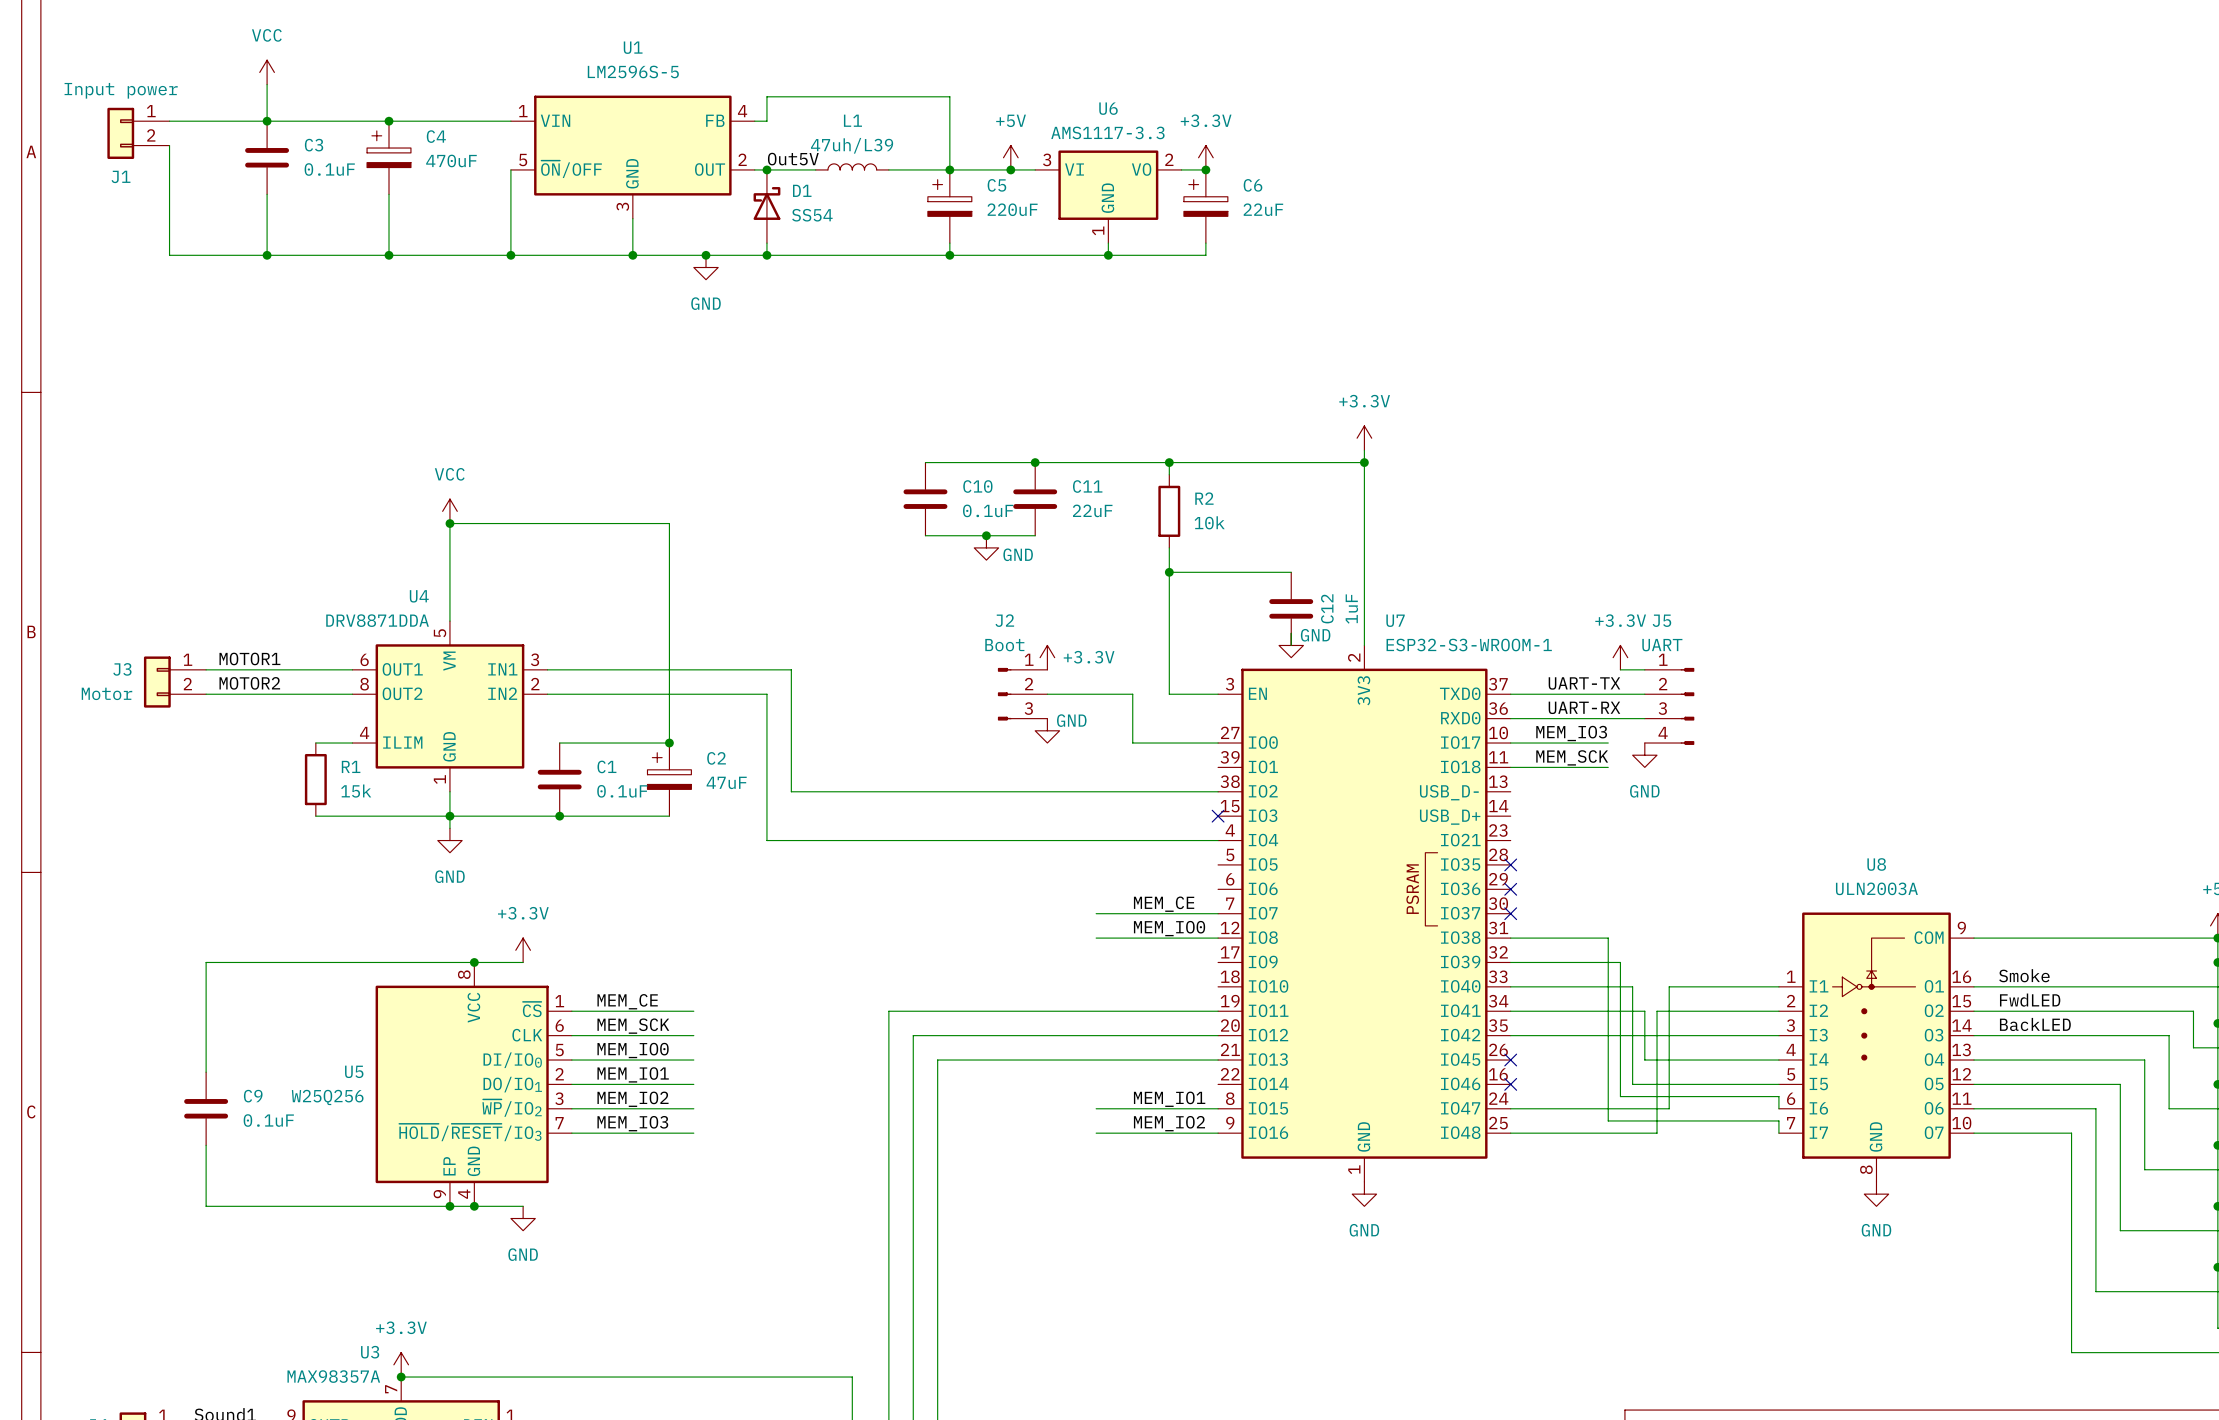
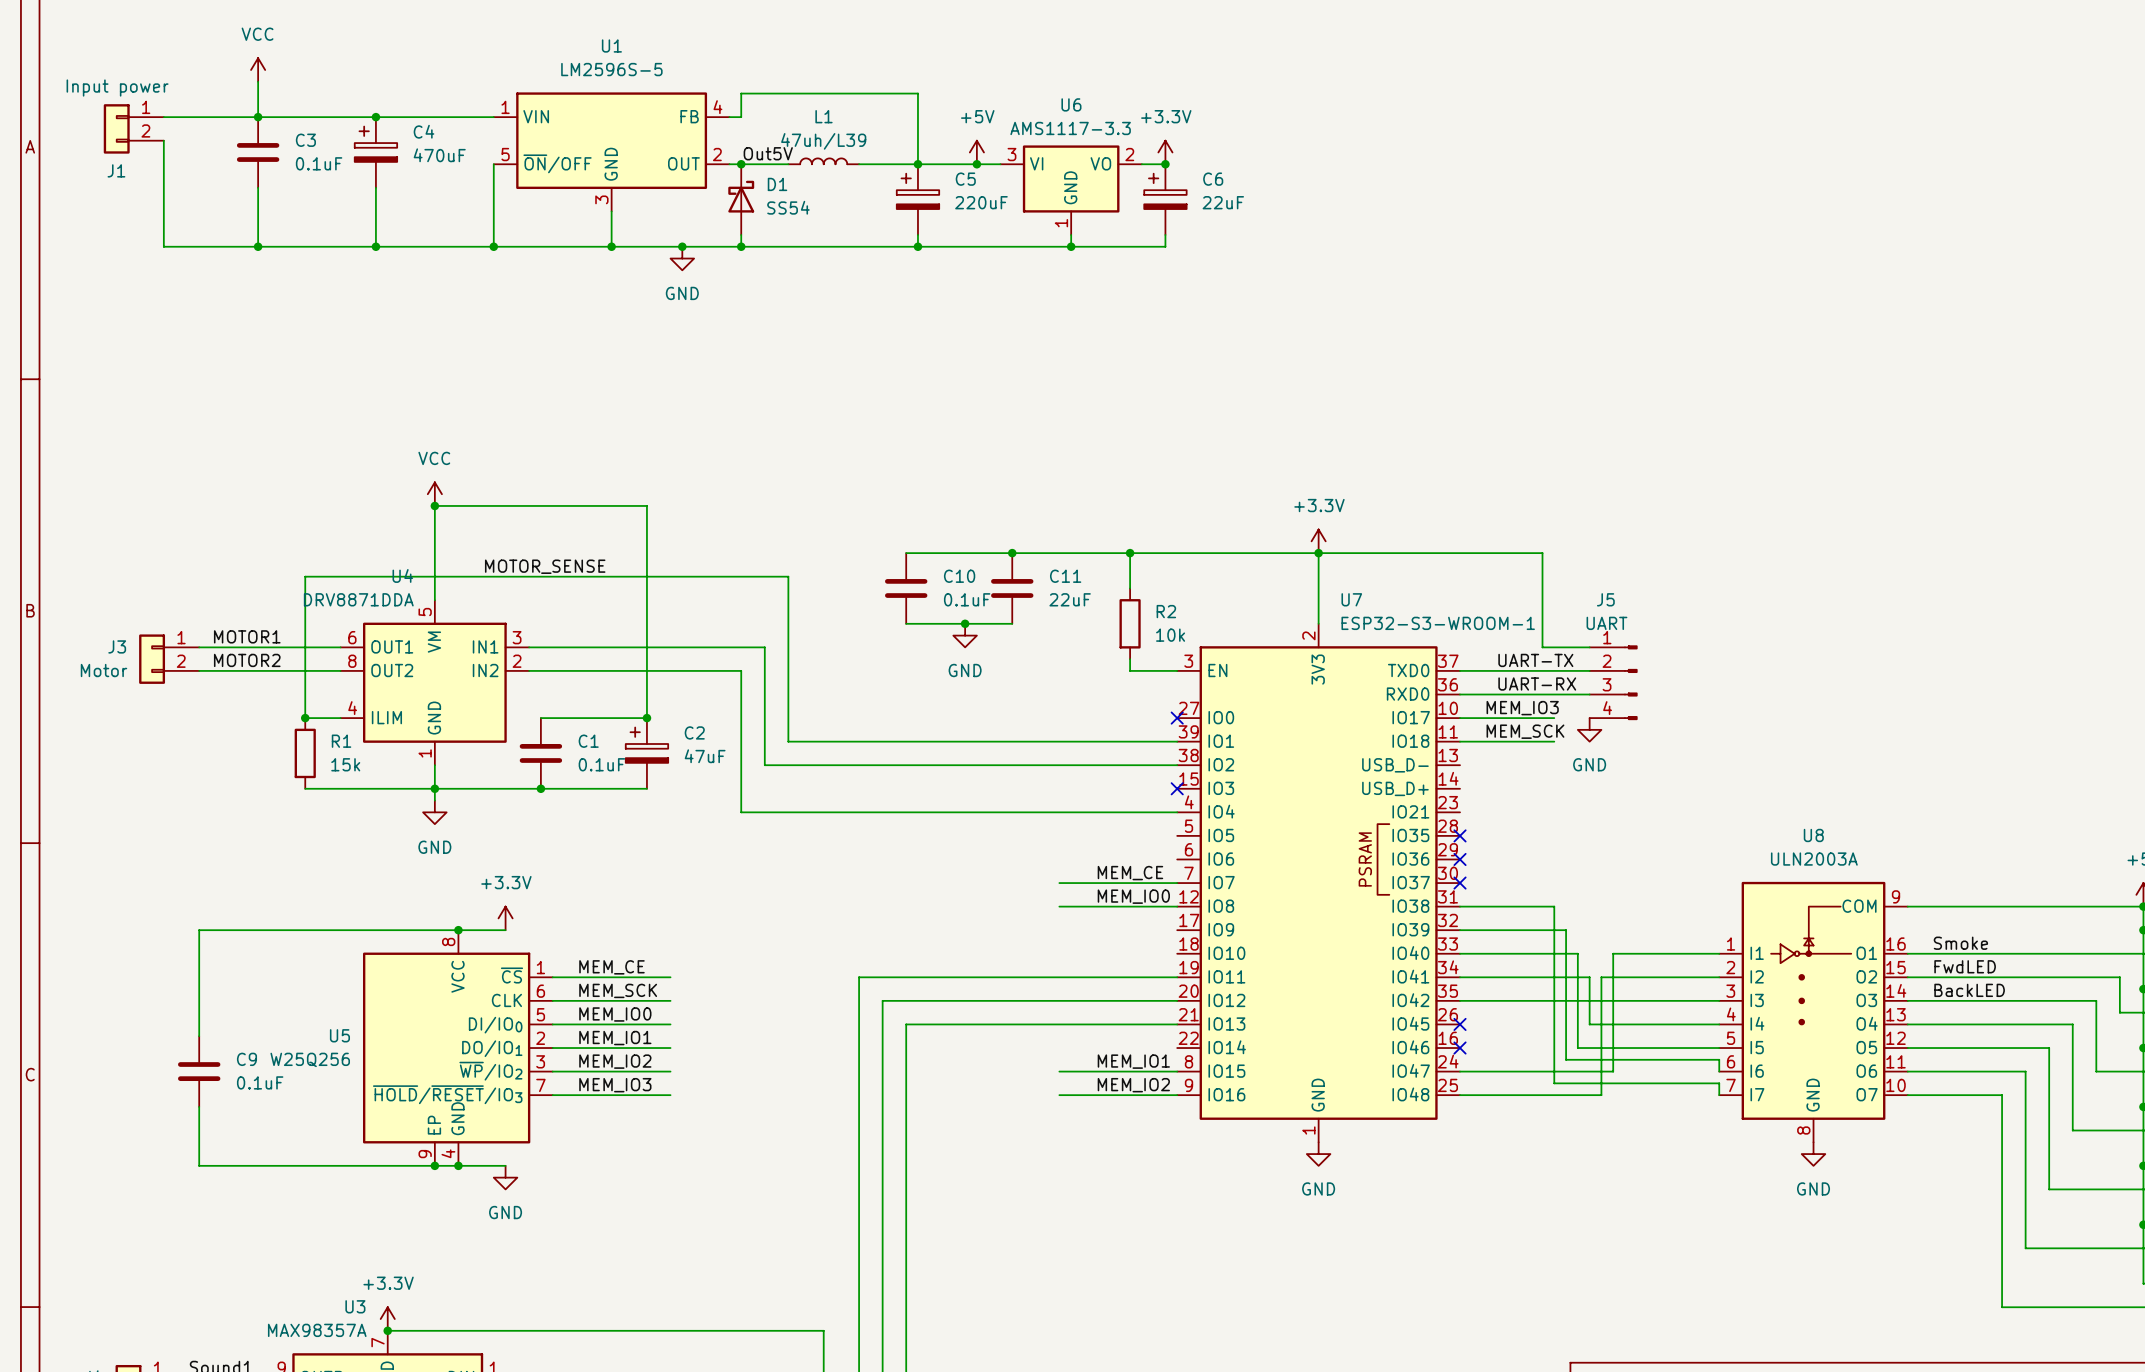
power symbol position: +3.3V (1364, 438) -> +3.3V (1318, 541)
wire: (1364, 450) (1364, 572) -> none
wire: (925, 462) (1364, 462) -> none
junction: (1035, 462) -> none
wire: (1169, 462) (1169, 474) -> none
junction: (1169, 462) -> none
junction: (1364, 462) -> none
C10 position: (925, 499) -> (906, 588)
C11 position: (1035, 499) -> (1012, 588)
R2 position: (1169, 511) -> (1130, 623)
wire: (925, 535) (1035, 535) -> (906, 623) (1012, 623)
junction: (986, 535) -> none
power symbol: GND (986, 547) -> none
wire: (1169, 547) (1169, 572) -> (906, 553) (1130, 553)
junction: none -> (1012, 553)
wire: none -> (1247, 553) (1542, 553) (1542, 647) (1566, 647)
junction: none -> (1318, 553)
label: none -> MOTOR_SENSE (545, 566)
wire: (1169, 608) (1169, 682) -> none
C12: 1uF (1291, 608) -> none
wire: (1291, 633) (1291, 645) -> none
junction: none -> (965, 623)
power symbol: GND (1291, 645) -> none
power symbol: none -> GND (965, 635)
power symbol: +3.3V (1047, 657) -> none
power symbol: +3.3V (1620, 657) -> none
J2: Boot (1022, 694) -> none
wire: (1047, 694) (1132, 694) (1132, 743) (1218, 743) -> none
power symbol: GND (1047, 730) -> none
wire: none -> (305, 718) (305, 576) (788, 576) (788, 741) (1177, 741)
junction: none -> (305, 718)
no-connect mark: none -> (1177, 718)

